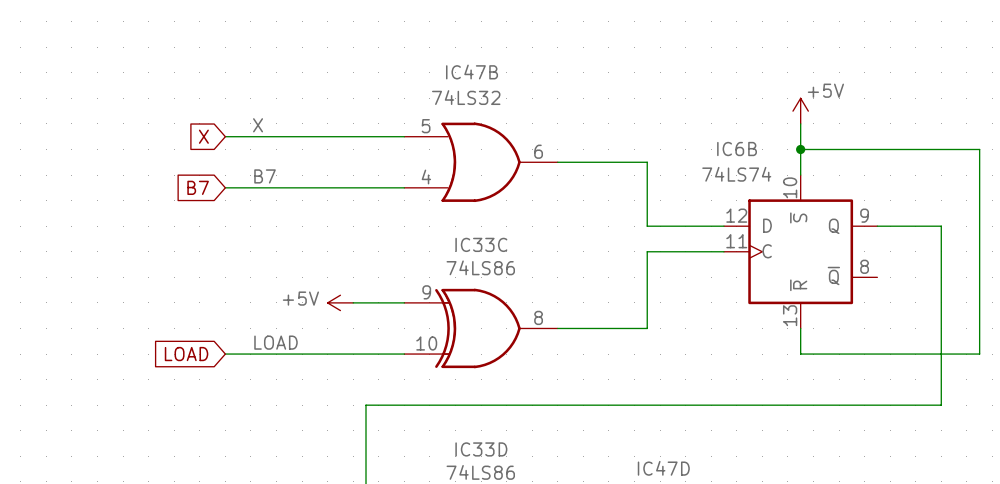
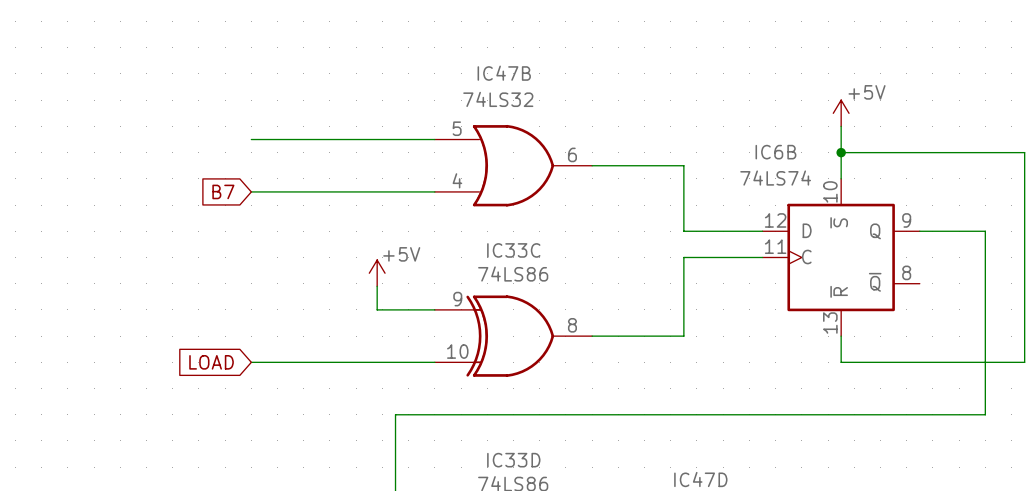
label: X (258, 125) -> none
global label: X (203, 136) -> none
label: B7 (265, 176) -> none
wire: none -> (377, 286) (377, 309) (382, 309)
power symbol text position: +5V (300, 298) -> +5V (401, 254)
power symbol rotation: 0° (340, 302) -> 90° clockwise (377, 273)
power symbol position: +5V (340, 302) -> +5V (377, 273)
label: LOAD (275, 342) -> none

